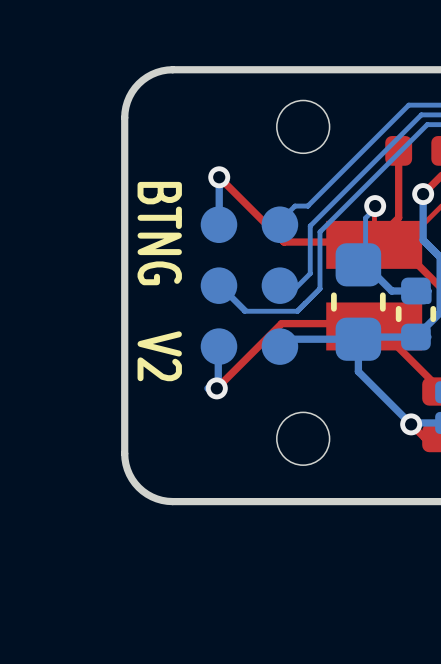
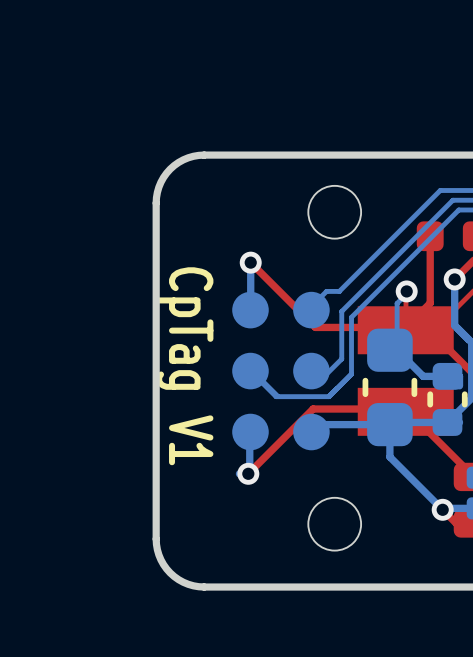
text: BTNG V2 (159, 281) -> CpTag V1 (184, 366)

